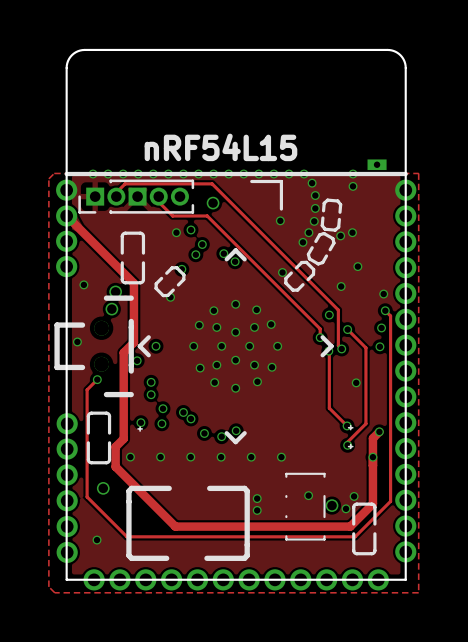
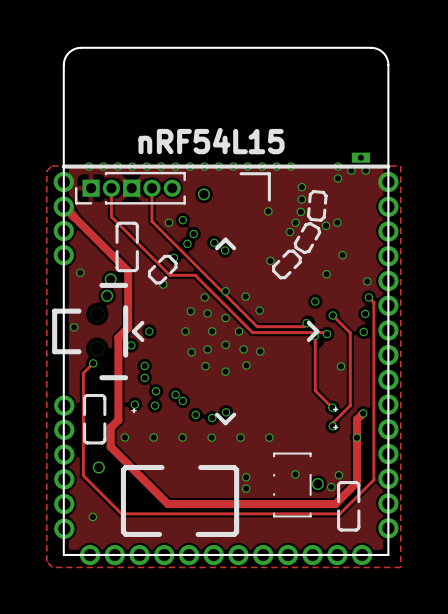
via: none -> (351, 170)
via: none -> (365, 170)
via: (312, 183) -> none
track: (116, 192) (125, 183) (212, 183) (338, 310) (338, 345) (340, 347) -> (111, 188) (111, 216) (169, 275) (195, 275) (252, 332) (325, 332)
track: (158, 202) (172, 215) (207, 215) (320, 328) (320, 337) -> (151, 193) (151, 221) (257, 326) (304, 326) (308, 322) (306, 321)
via: (254, 327) -> none
via: (277, 346) -> none

